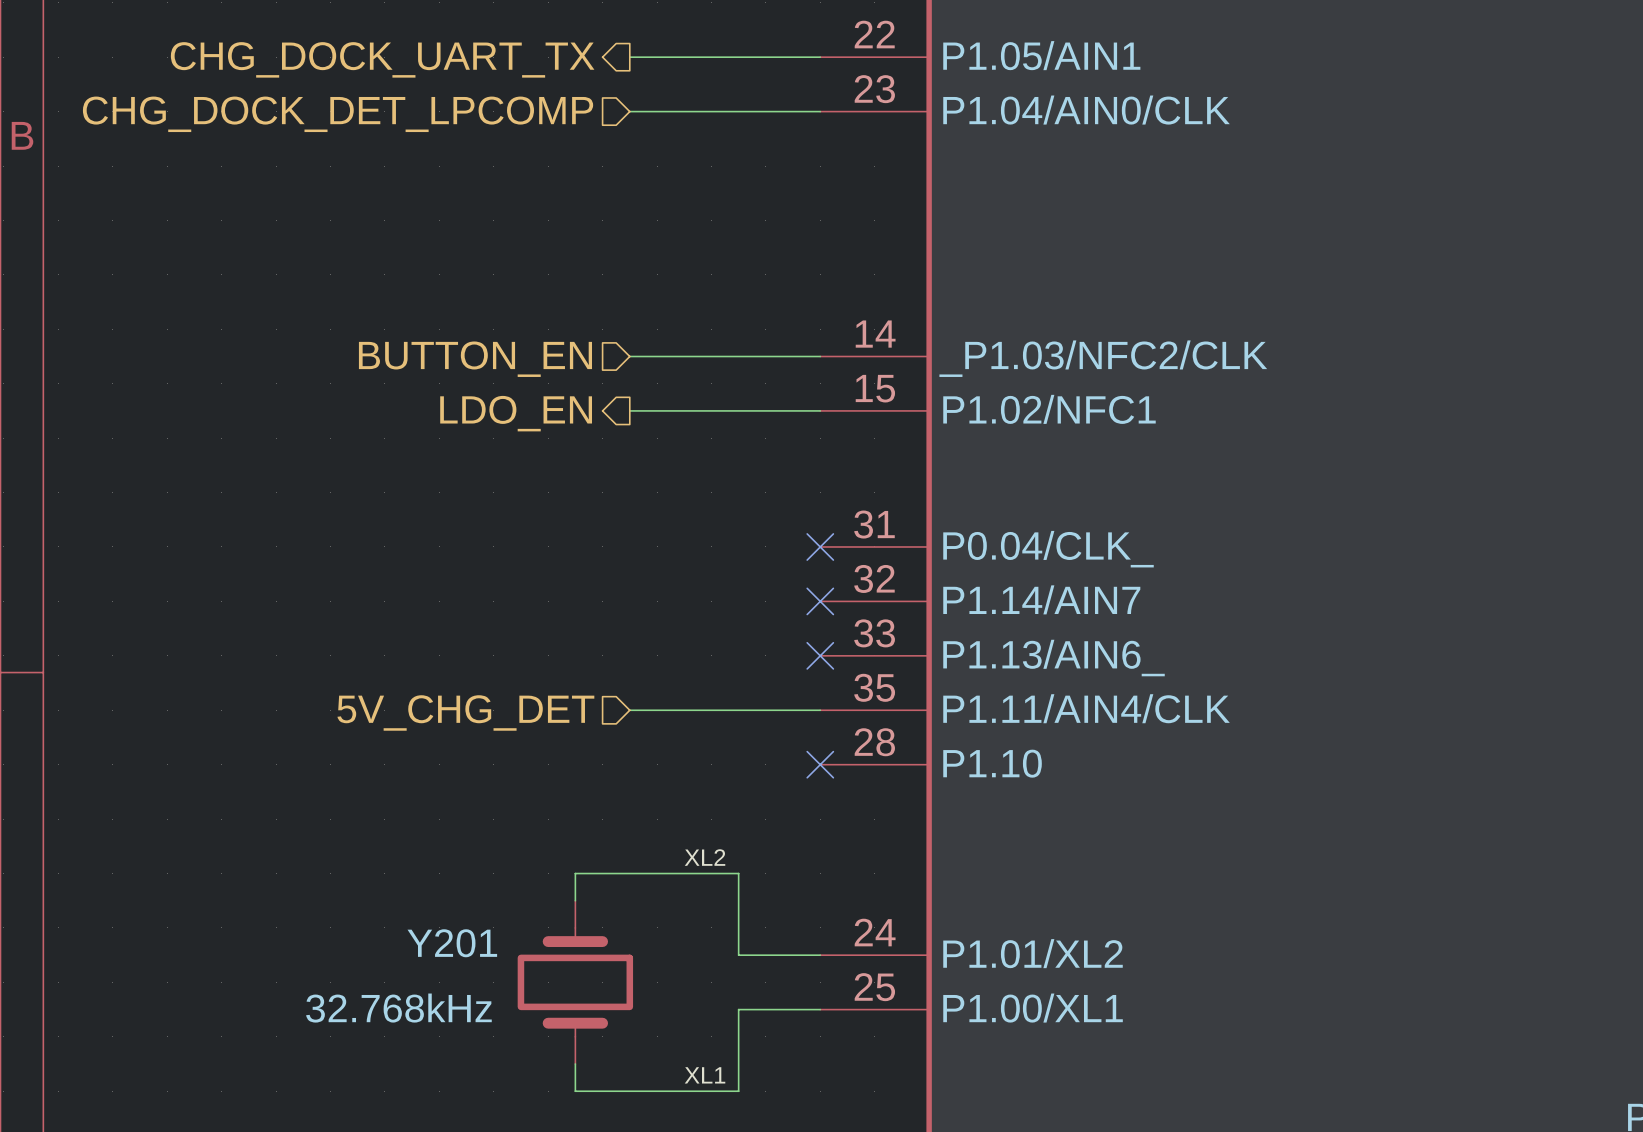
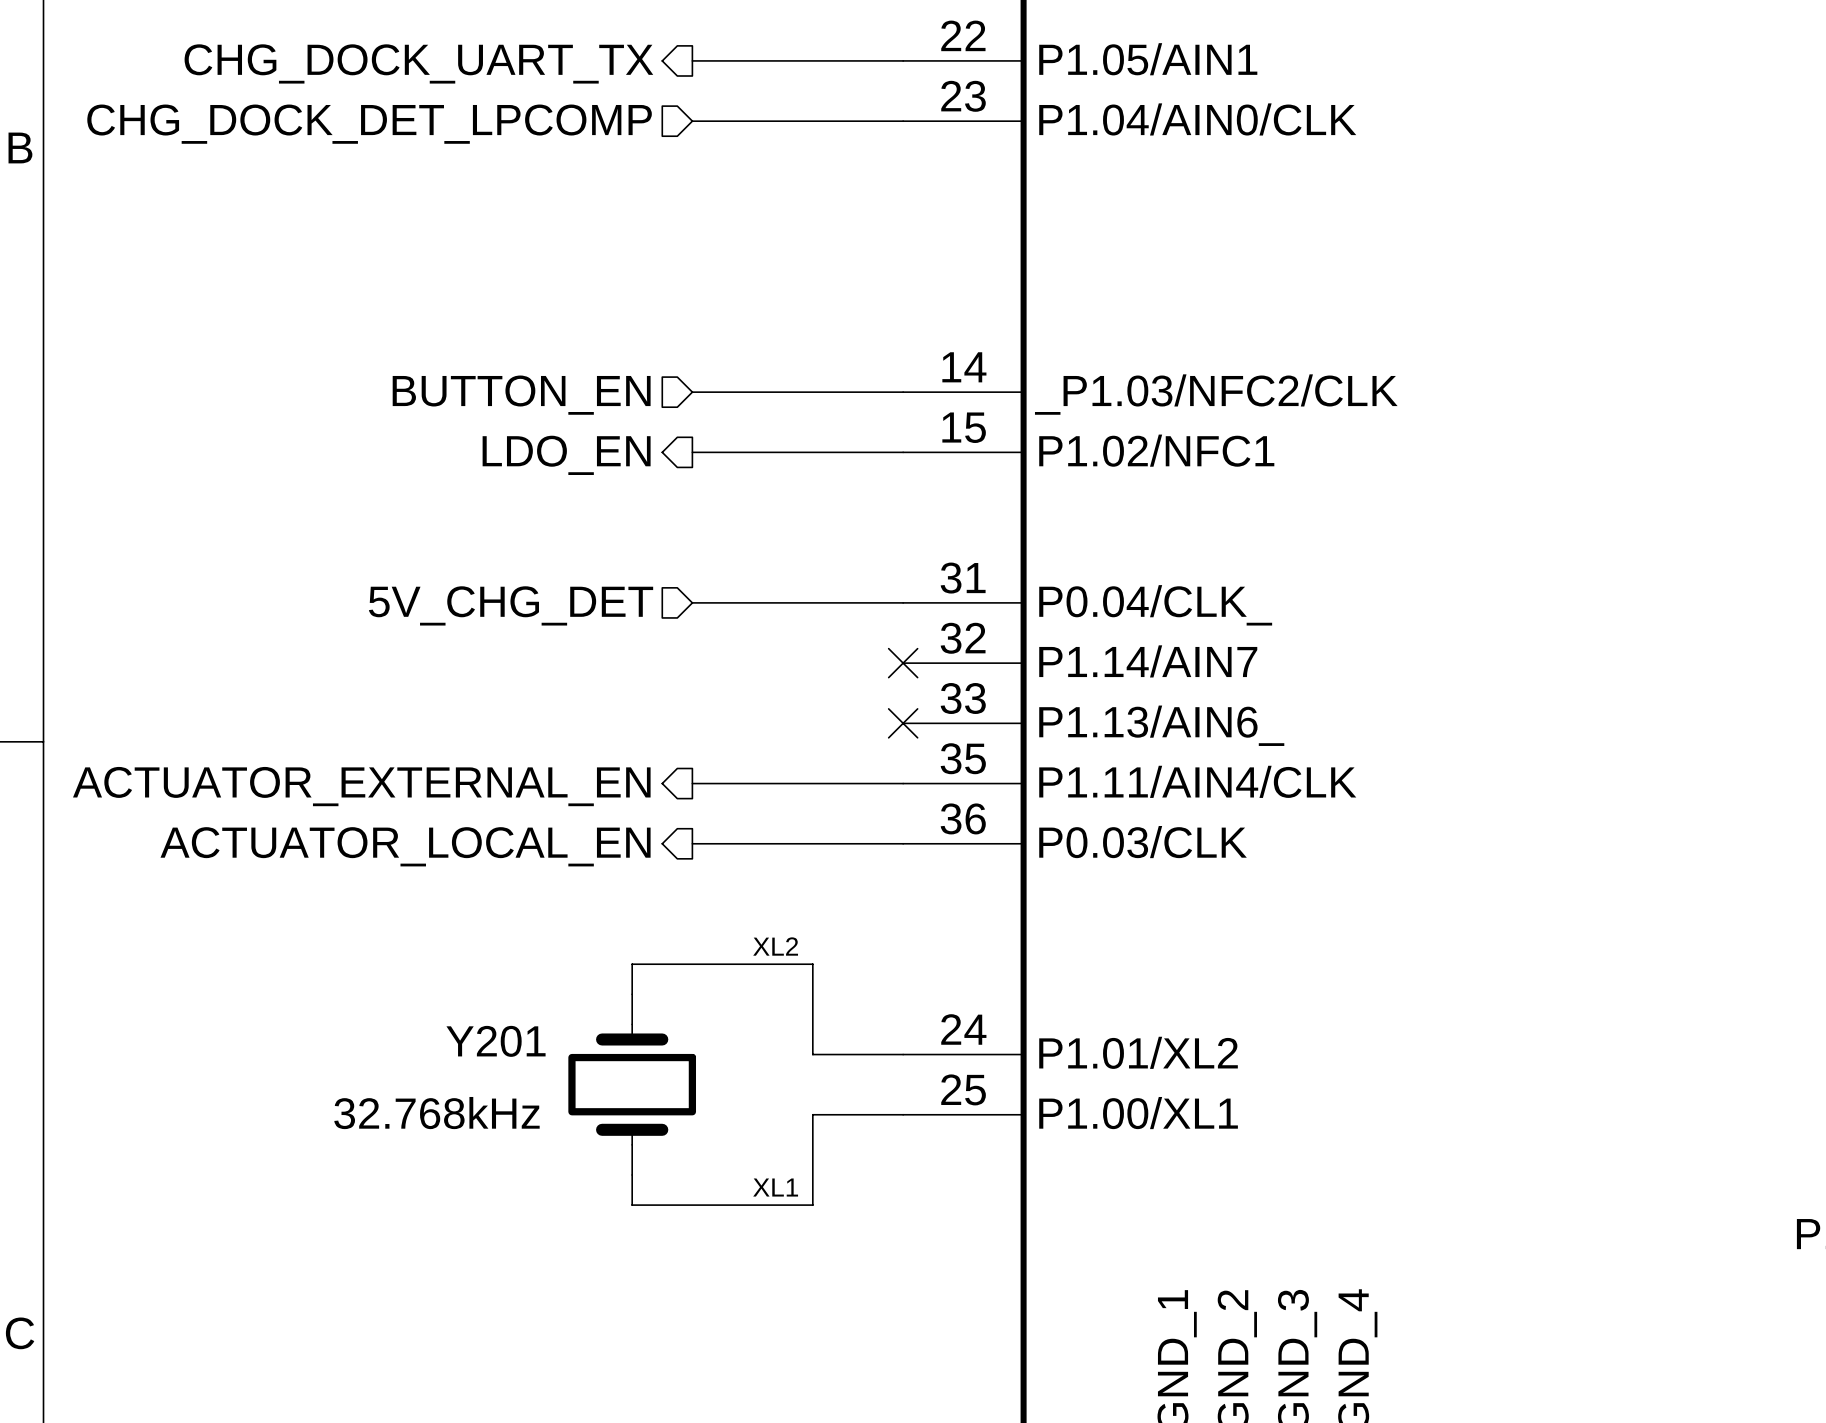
wire: none -> (692, 602) (903, 602)
no-connect mark: (820, 546) -> none
hierarchical label: none -> 5V_CHG_DET (511, 605)
hierarchical label shape: input (465, 712) -> output (361, 786)
hierarchical label: 5V_CHG_DET (465, 712) -> ACTUATOR_EXTERNAL_EN (361, 786)
part pin number: 28 (874, 742) -> 36 (963, 818)
part pin name: P1.10 (992, 763) -> P0.03/CLK (1143, 842)
wire: none -> (692, 843) (903, 843)
no-connect mark: (820, 764) -> none
hierarchical label: none -> ACTUATOR_LOCAL_EN (405, 846)

